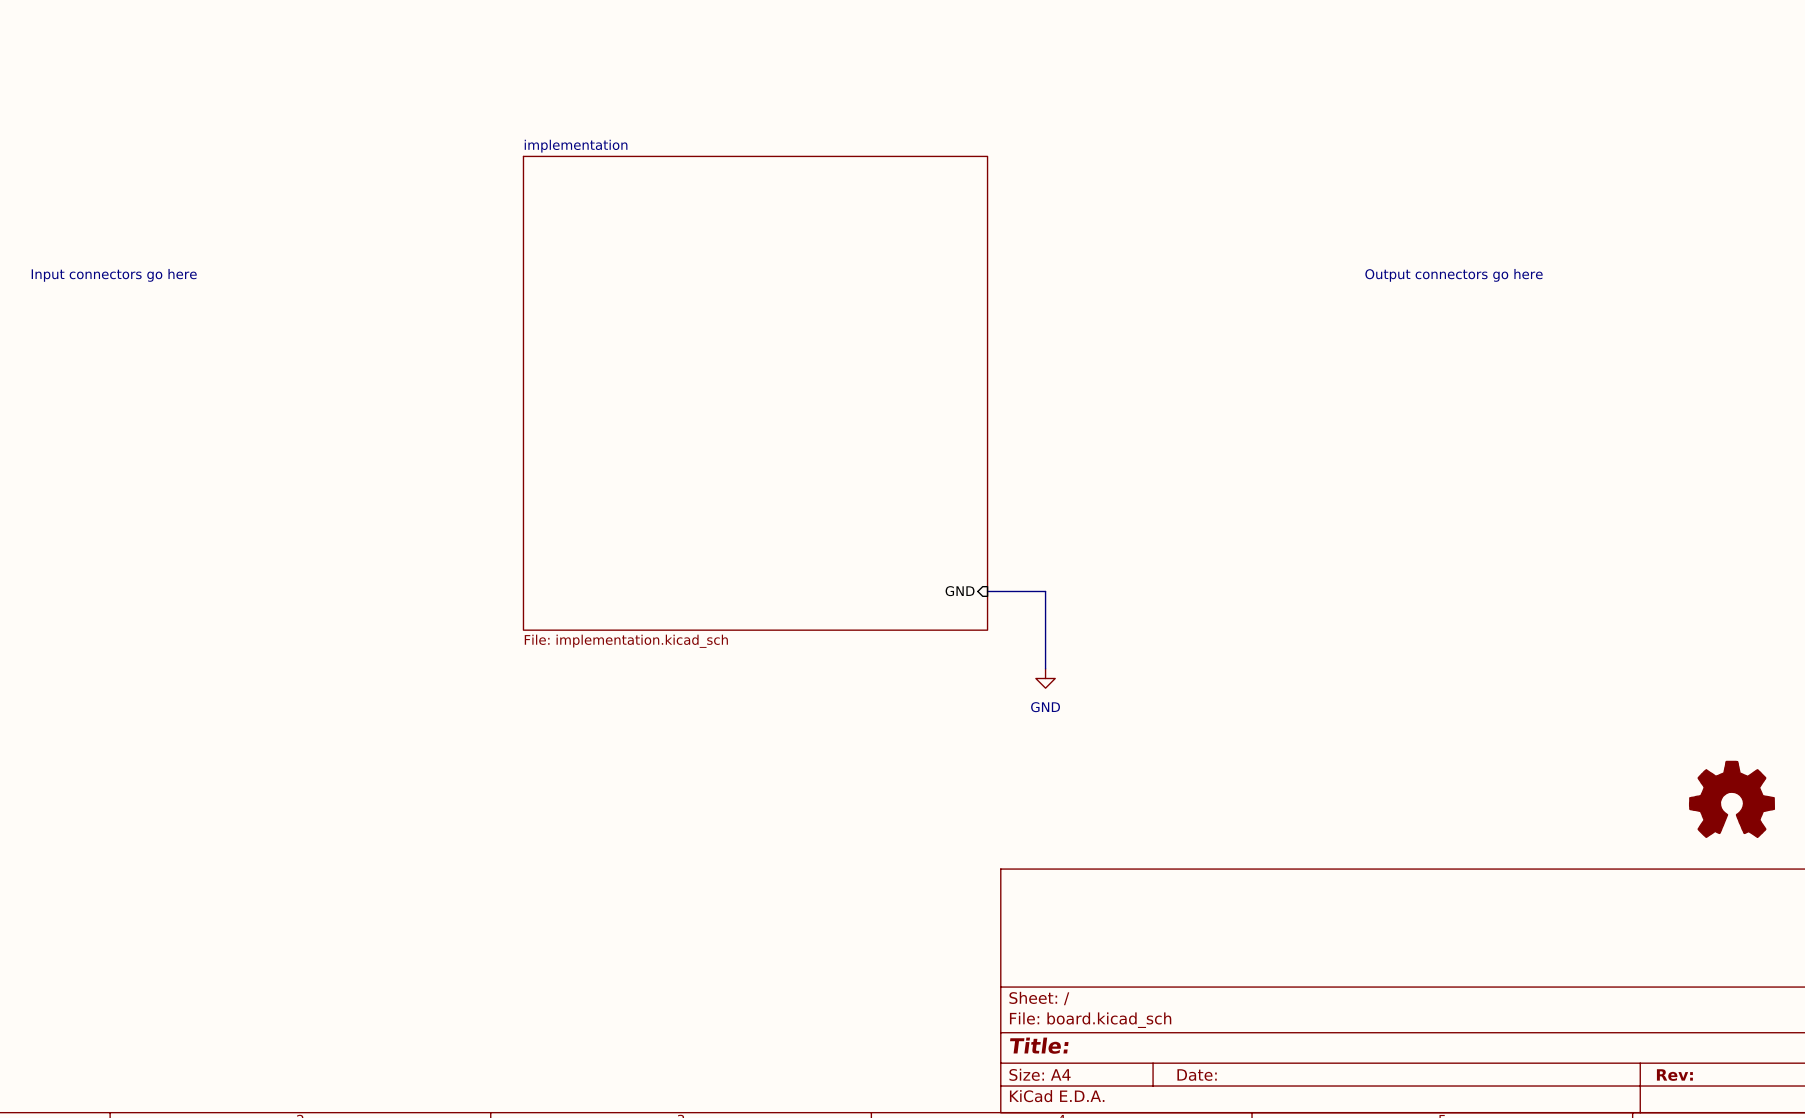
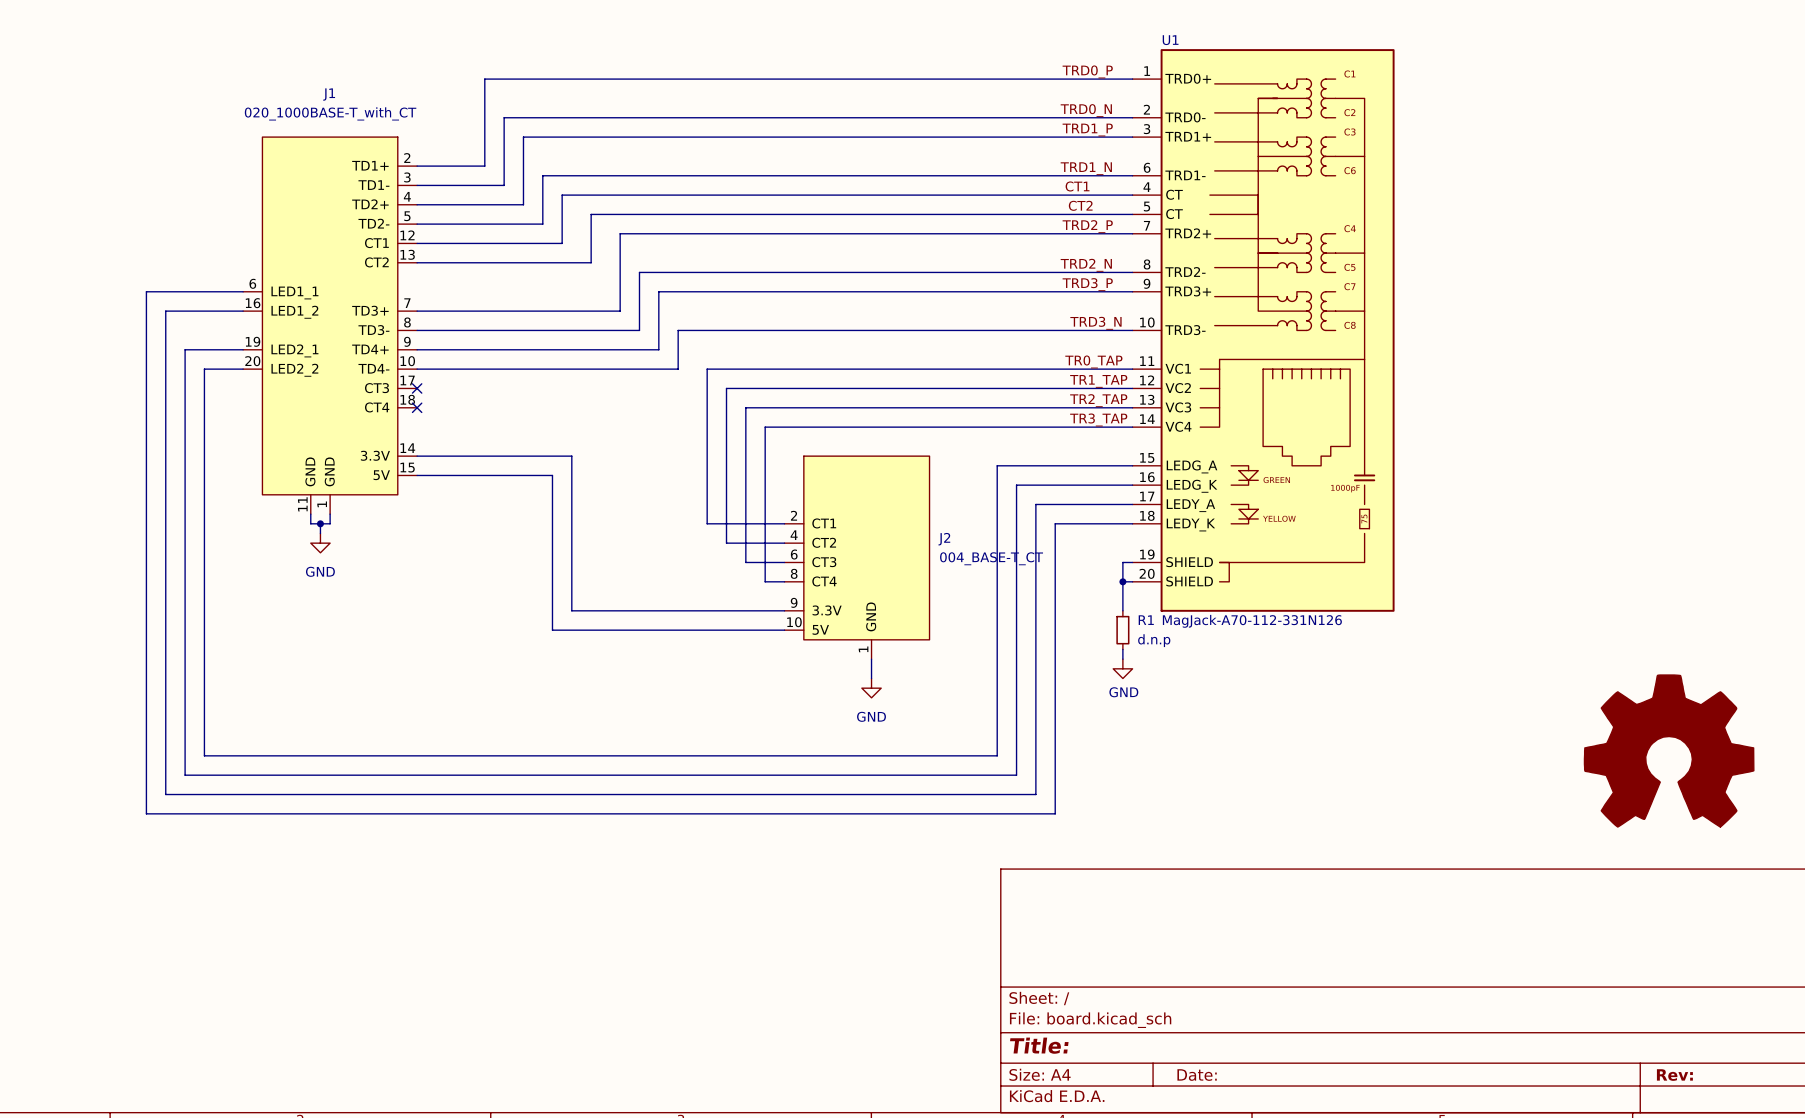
label: none -> TRD0_P (1087, 71)
wire: none -> (1132, 79) (484, 79) (484, 166) (417, 166)
label: none -> TRD0_N (1086, 110)
wire: none -> (1132, 117) (504, 117) (504, 185) (417, 185)
label: none -> TRD1_P (1087, 130)
wire: none -> (1132, 137) (523, 137) (523, 204) (417, 204)
label: none -> TRD1_N (1086, 168)
wire: none -> (1132, 175) (542, 175) (542, 224) (417, 224)
label: none -> CT1 (1077, 186)
wire: none -> (1132, 195) (562, 195) (562, 243) (417, 243)
label: none -> CT2 (1080, 205)
wire: none -> (1132, 214) (591, 214) (591, 262) (417, 262)
label: none -> TRD2_P (1087, 226)
wire: none -> (1132, 233) (620, 233) (620, 311) (417, 311)
label: none -> TRD2_N (1086, 265)
wire: none -> (1132, 272) (639, 272) (639, 330) (417, 330)
text: Input connectors go here (114, 275) -> none
text: Output connectors go here (1454, 275) -> none
label: none -> TRD3_P (1087, 284)
wire: none -> (243, 291) (146, 291) (146, 813) (1055, 813) (1055, 523) (1132, 523)
wire: none -> (1132, 291) (658, 291) (658, 349) (417, 349)
wire: none -> (243, 311) (165, 311) (165, 794) (1035, 794) (1035, 504) (1132, 504)
label: none -> TRD3_N (1095, 323)
J1: none -> 020_1000BASE-T_with_CT (330, 325)
wire: none -> (1132, 330) (678, 330) (678, 369) (417, 369)
U1: none -> MagJack-A70-112-331N126 (1263, 330)
wire: none -> (243, 349) (185, 349) (185, 775) (1016, 775) (1016, 485) (1132, 485)
label: none -> TR0_TAP (1093, 361)
wire: none -> (243, 369) (204, 369) (204, 755) (997, 755) (997, 465) (1132, 465)
wire: none -> (1132, 369) (707, 369) (707, 523) (784, 523)
label: none -> TR1_TAP (1098, 381)
no-connect mark: none -> (417, 388)
wire: none -> (1132, 388) (726, 388) (726, 543) (784, 543)
sheet implementation: File: implementation.kicad_sch (755, 393) -> none
label: none -> TR2_TAP (1098, 400)
no-connect mark: none -> (417, 407)
wire: none -> (1132, 407) (745, 407) (745, 562) (784, 562)
label: none -> TR3_TAP (1098, 419)
wire: none -> (1132, 427) (765, 427) (765, 581) (784, 581)
wire: none -> (417, 456) (571, 456) (571, 610) (784, 610)
wire: none -> (417, 475) (552, 475) (552, 630) (784, 630)
wire: none -> (310, 514) (310, 523) (330, 523) (330, 514)
wire: none -> (320, 523) (320, 533)
junction: none -> (320, 523)
power symbol: none -> GND (320, 543)
J2: none -> 004_BASE-T_CT (857, 557)
wire: none -> (1132, 562) (1122, 562) (1122, 610)
wire: none -> (1122, 581) (1132, 581)
junction: none -> (1122, 581)
sheet pin: GND (960, 591) -> none
wire: (987, 591) (1045, 591) (1045, 668) -> none
R1: none -> d.n.p (1122, 630)
wire: none -> (1122, 649) (1122, 659)
wire: none -> (871, 659) (871, 678)
power symbol position: GND (1045, 678) -> GND (1122, 668)
power symbol: none -> GND (871, 688)
power symbol text position: GND (1045, 707) -> GND (1123, 692)
part: none -> (1669, 751)
part: (1731, 799) -> none

